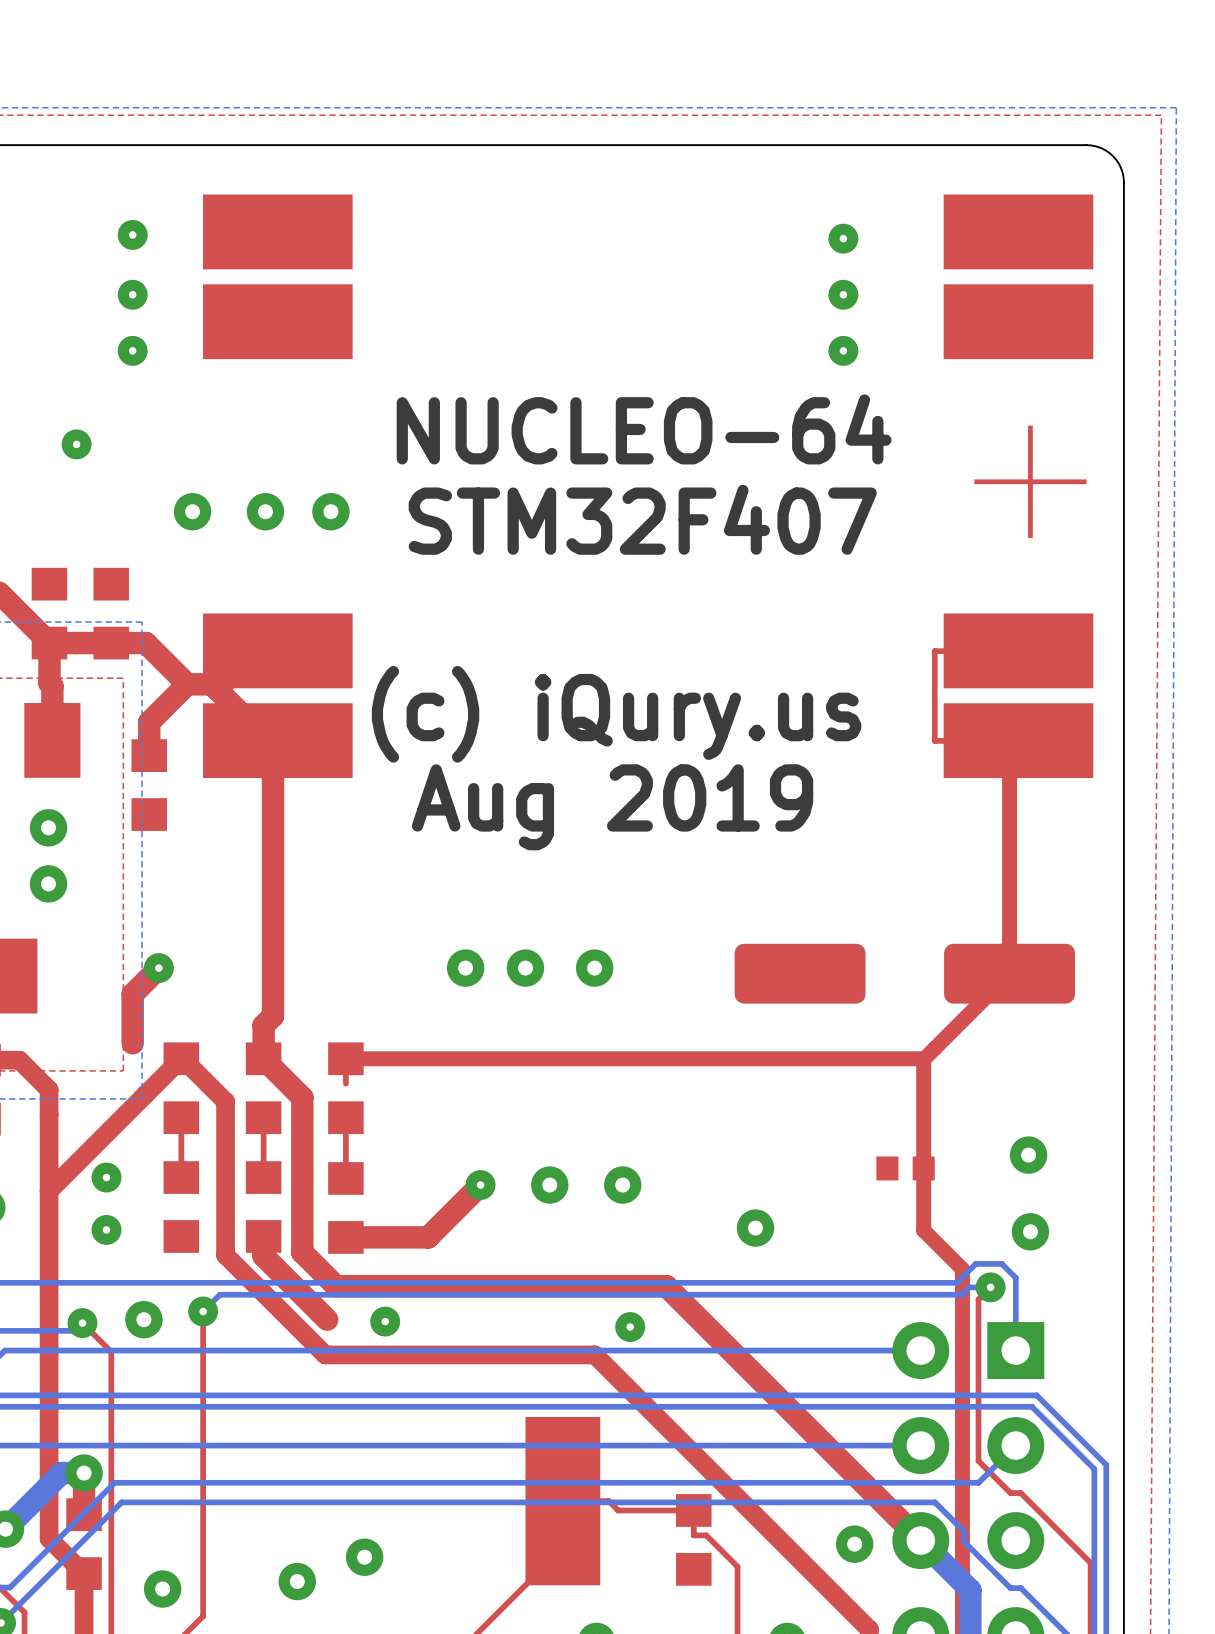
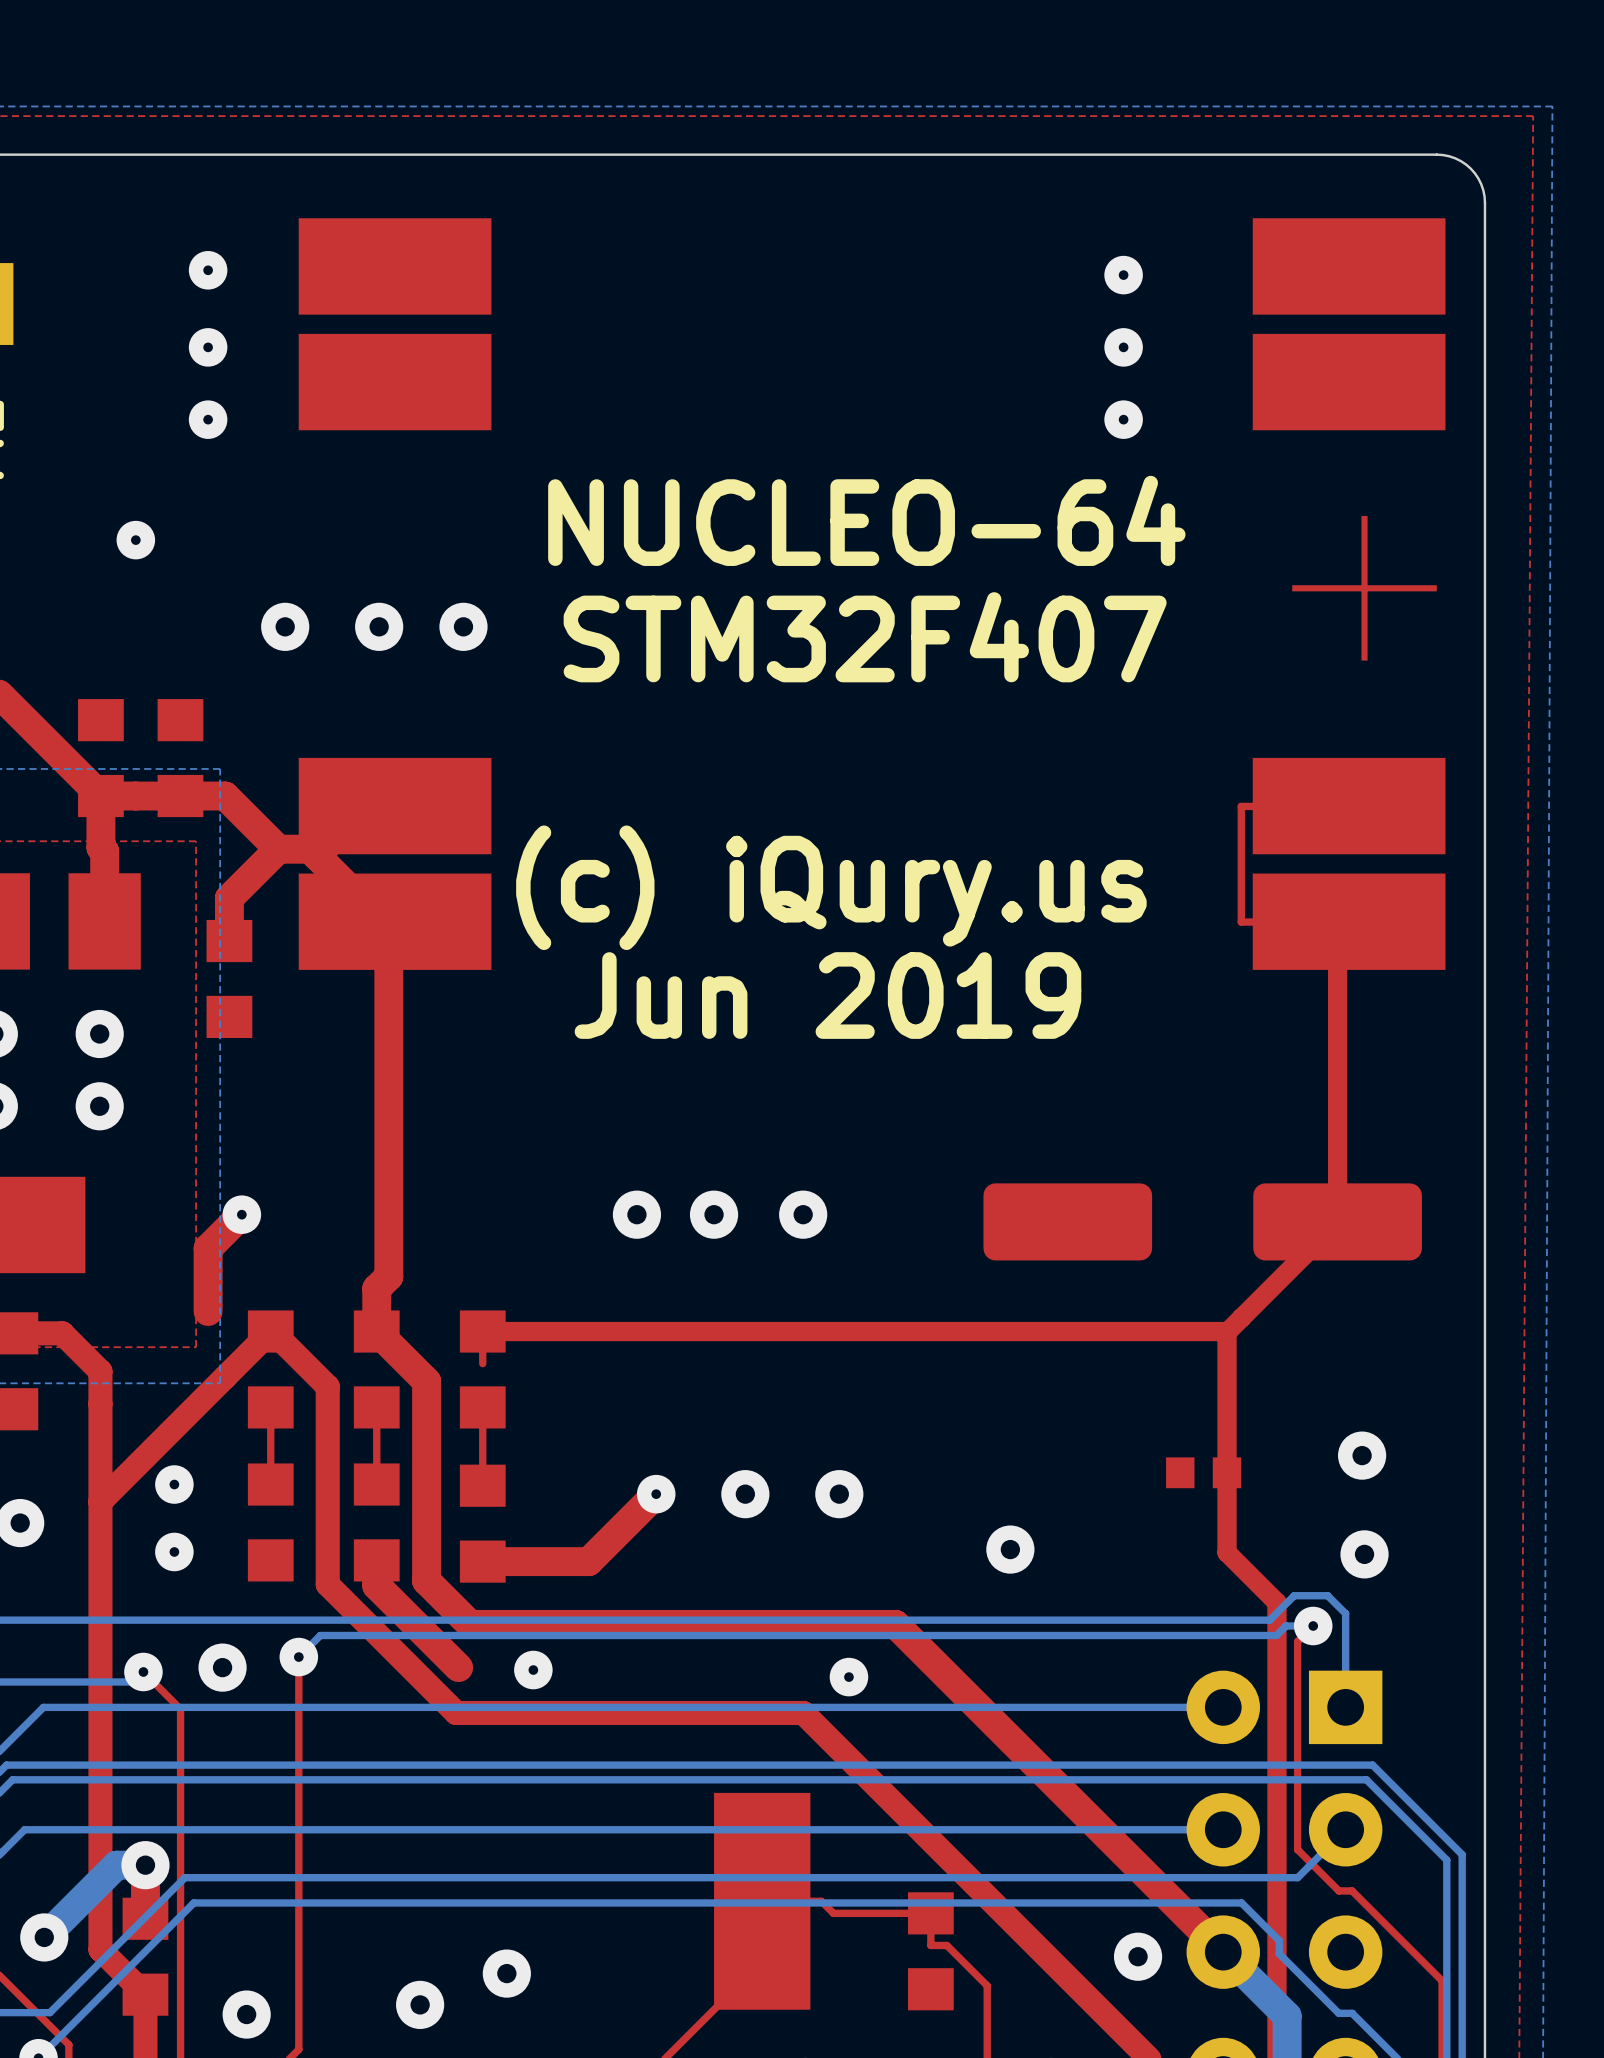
text: Aug 2019 (612, 807) -> Jun 2019 (827, 995)

